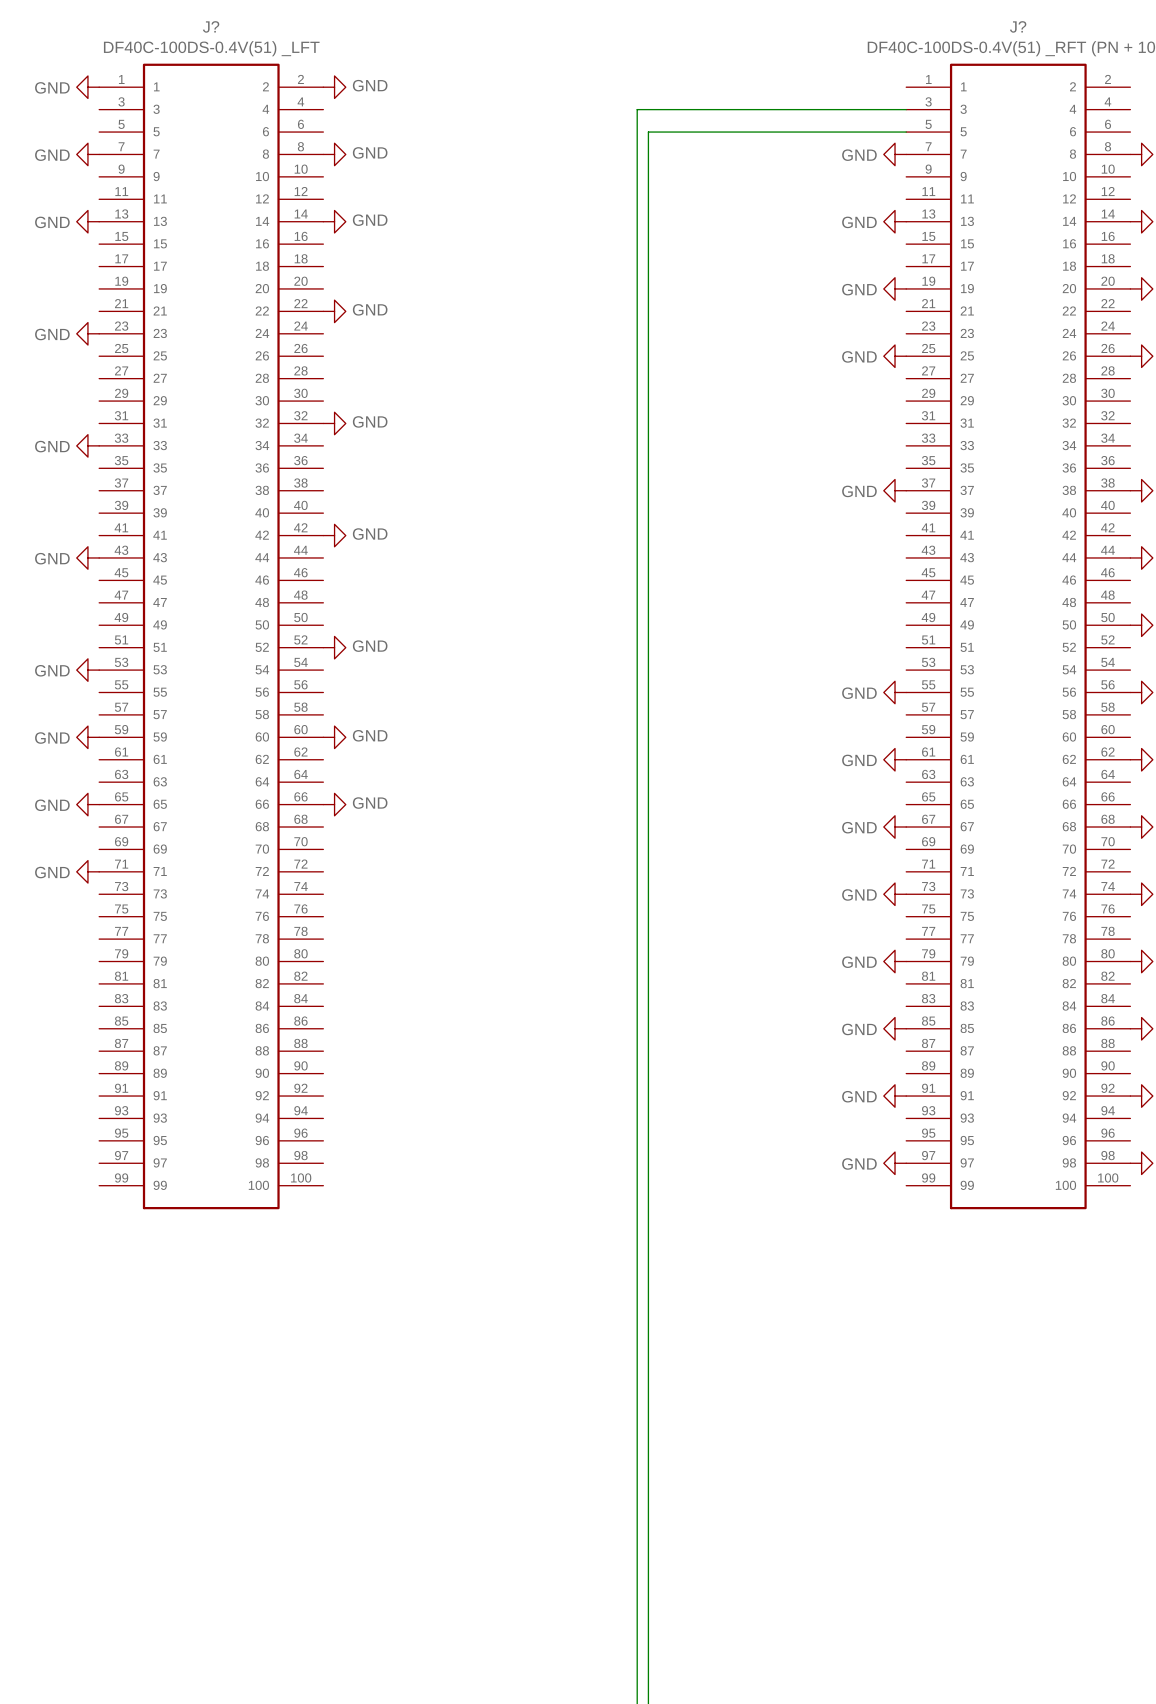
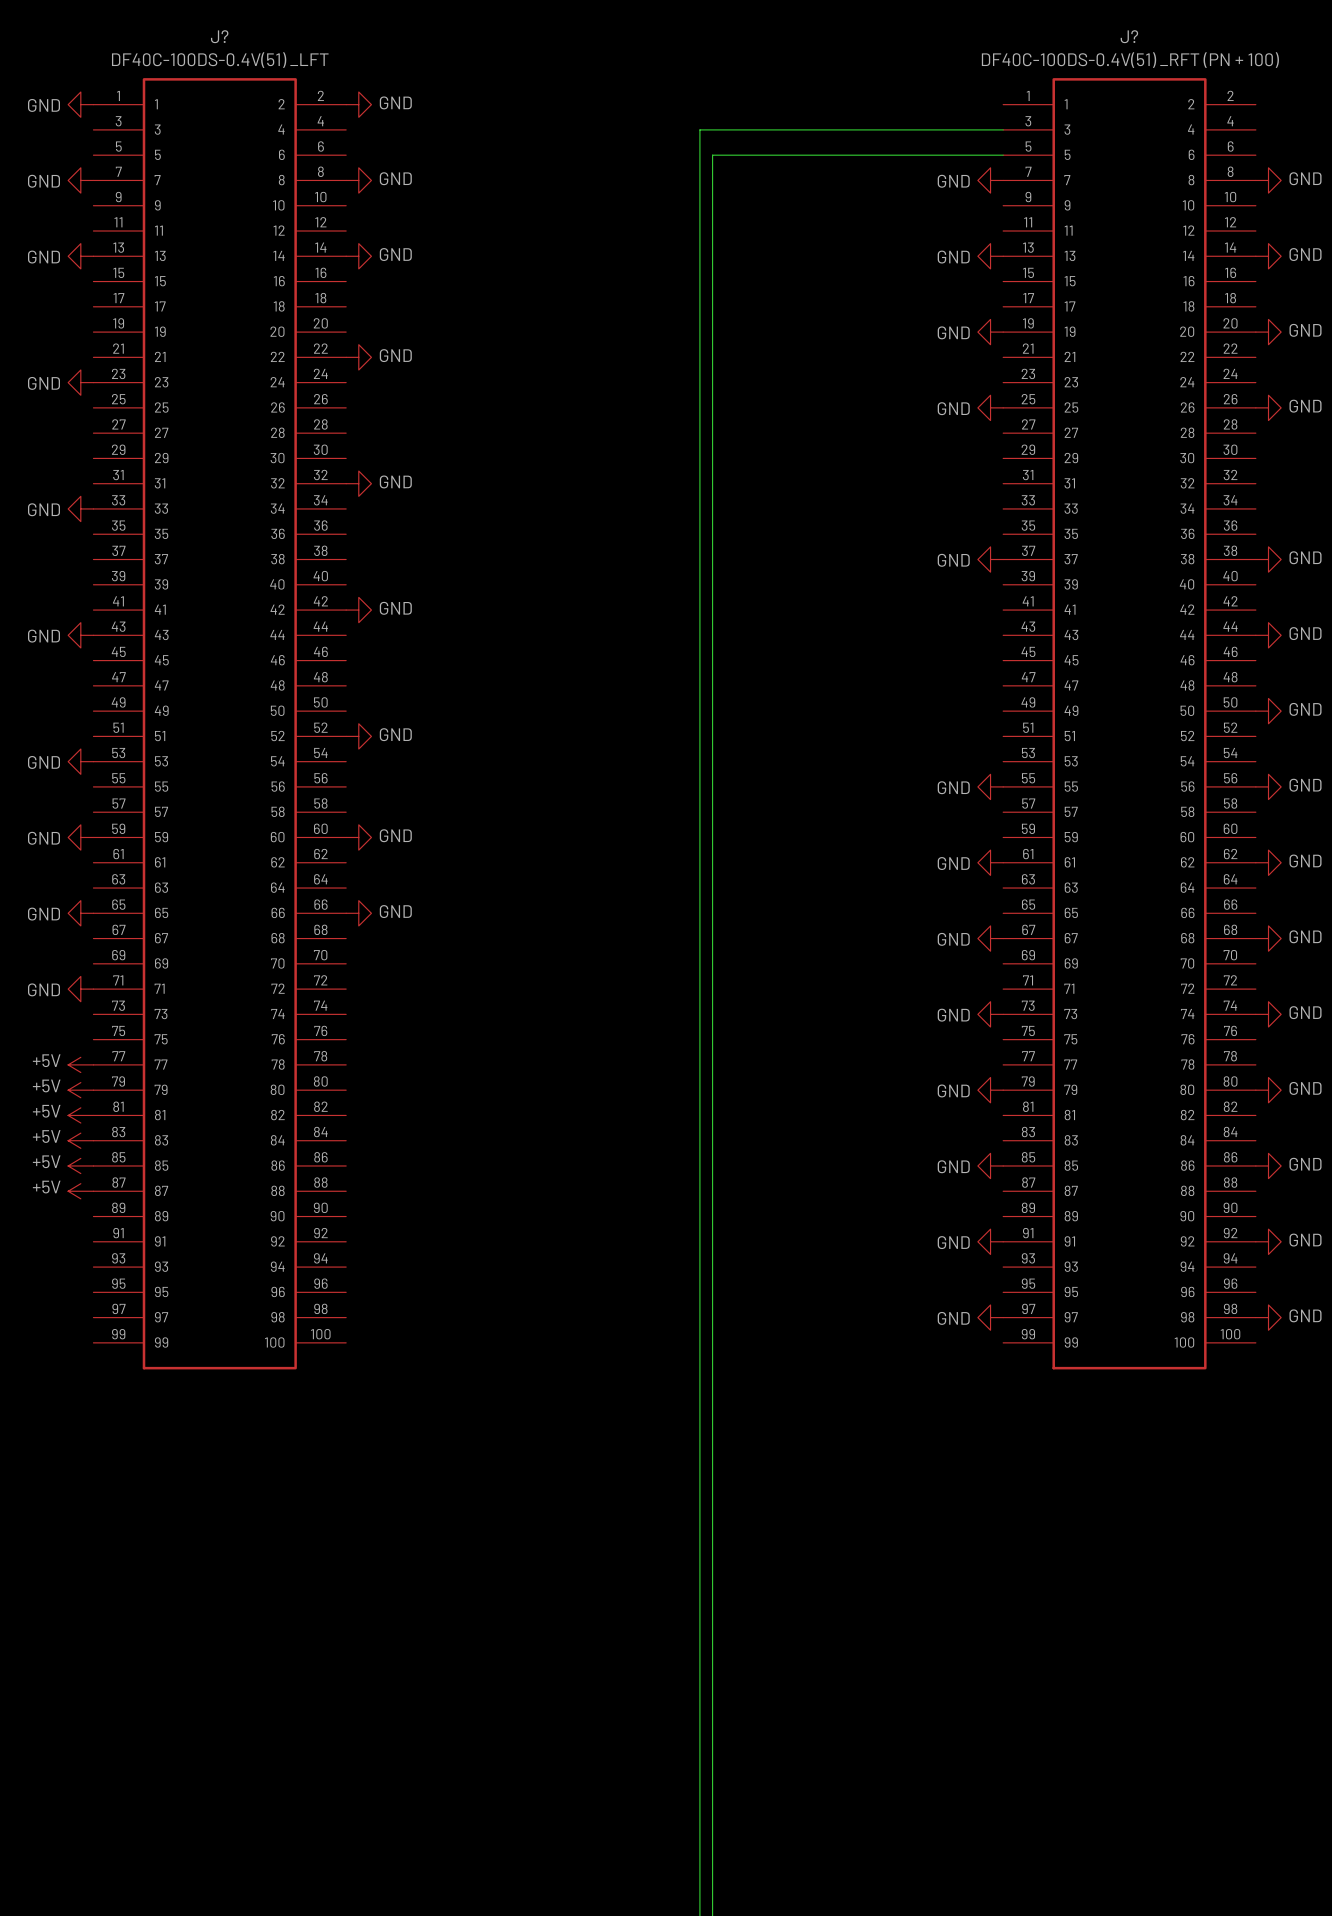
power symbol: none -> +5V (80, 1064)
power symbol: none -> +5V (80, 1090)
power symbol: none -> +5V (80, 1115)
power symbol: none -> +5V (80, 1140)
power symbol: none -> +5V (80, 1165)
power symbol: none -> +5V (80, 1191)

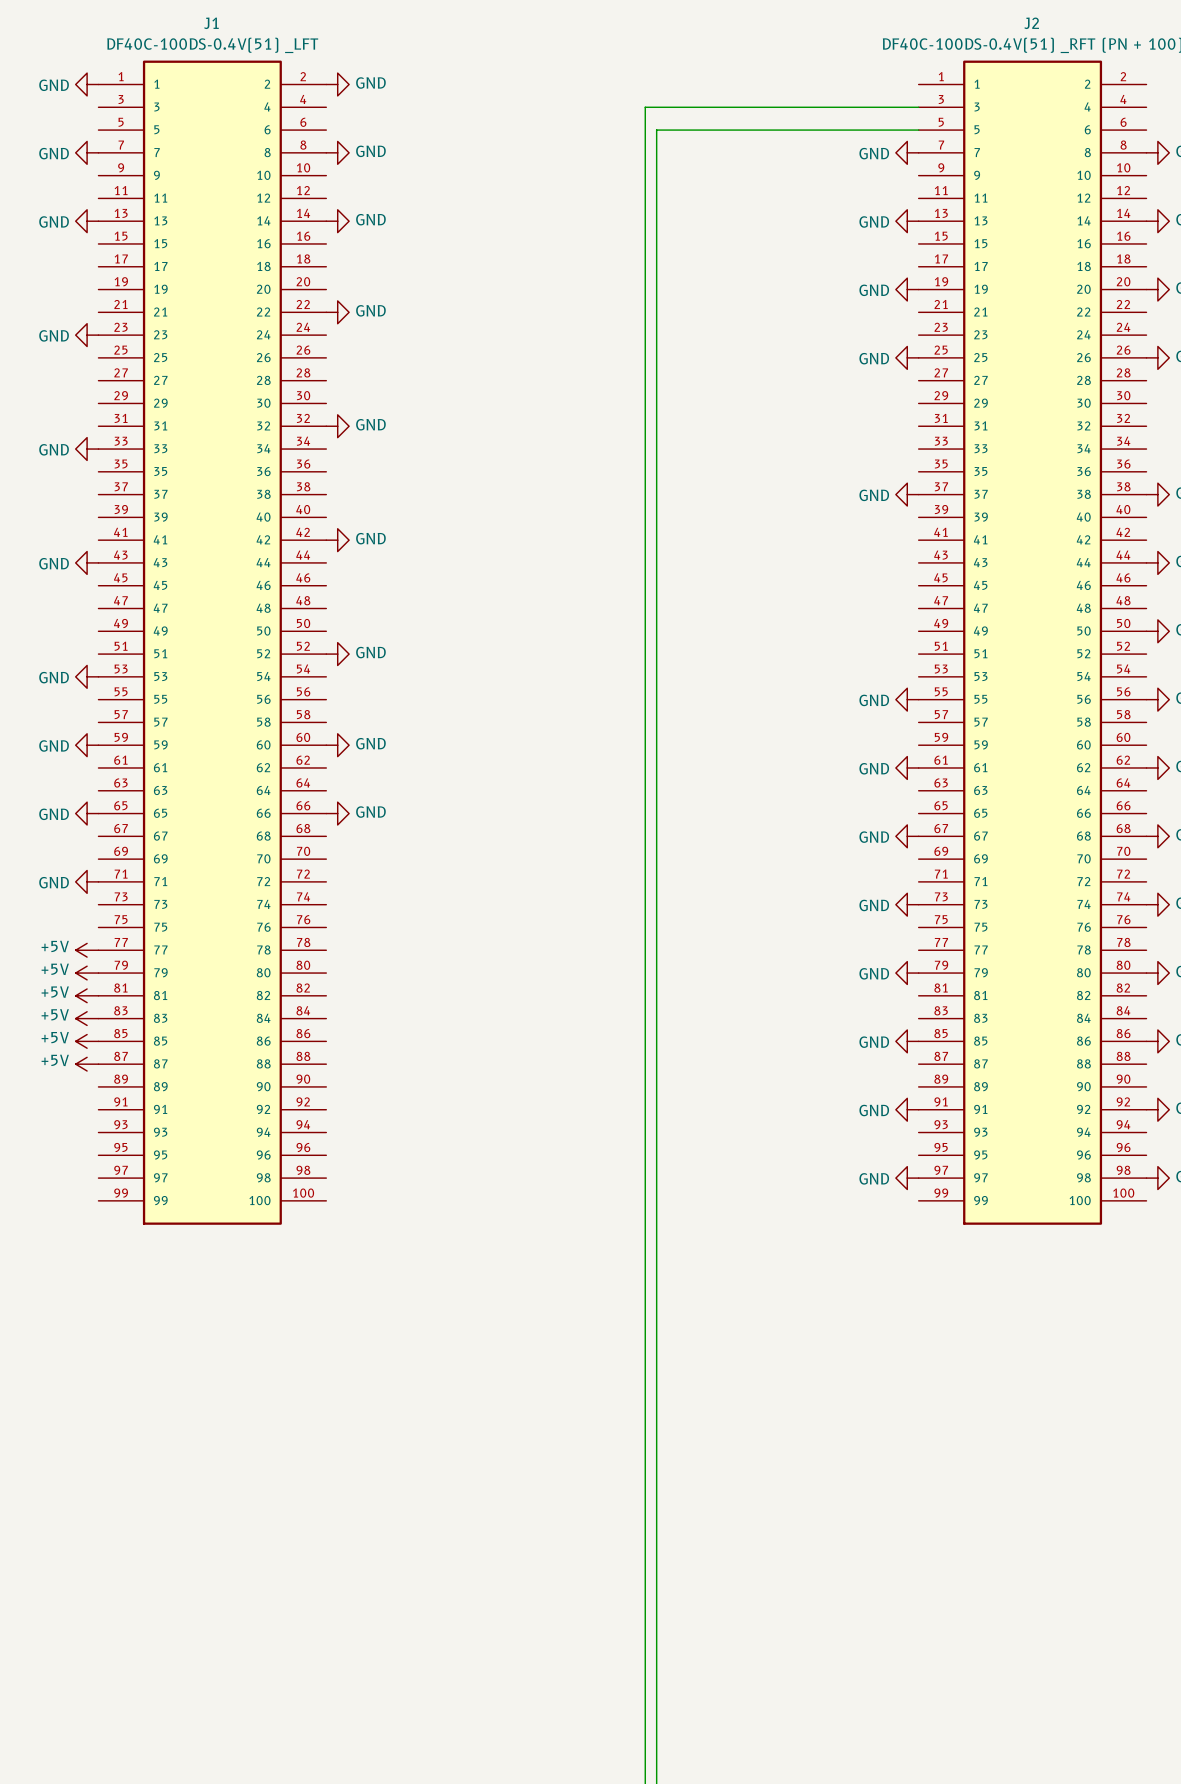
J? name: J? (219, 36) -> J1 (211, 23)
J? name: J? (1129, 36) -> J2 (1031, 23)

